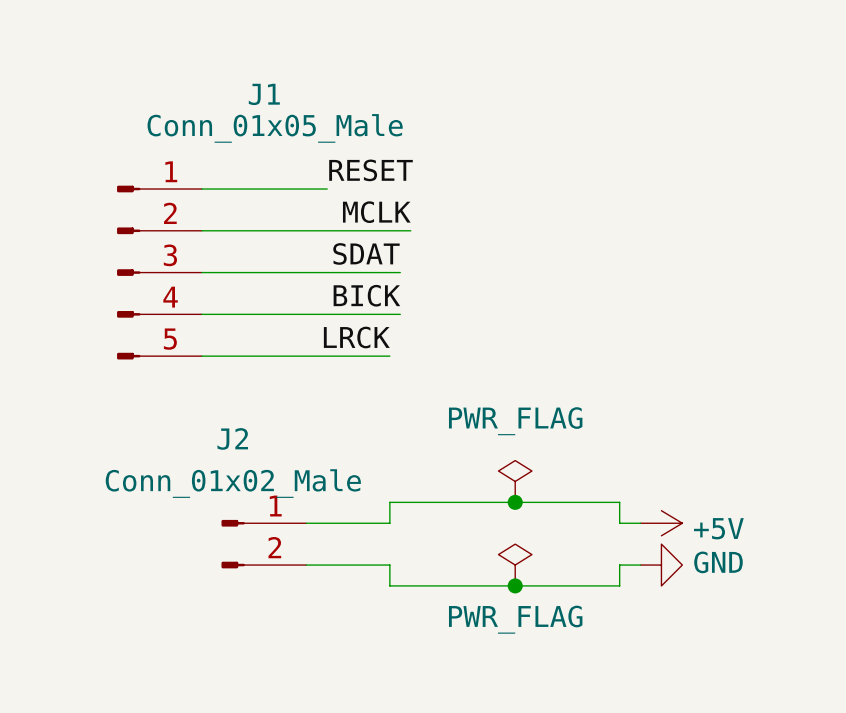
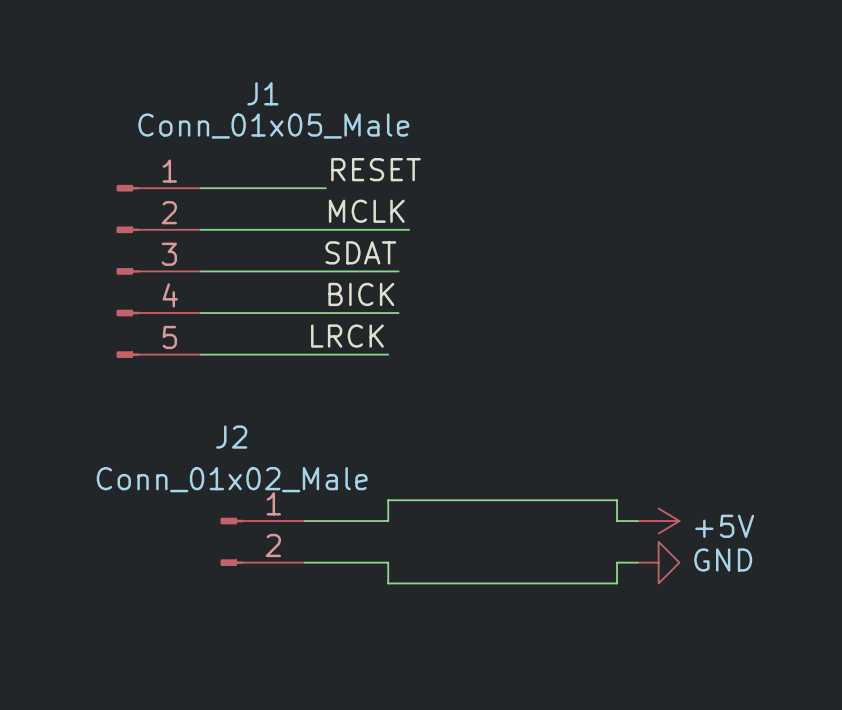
power symbol: PWR_FLAG (515, 481) -> none
junction: (515, 502) -> none
power symbol: PWR_FLAG (515, 565) -> none
junction: (515, 585) -> none

